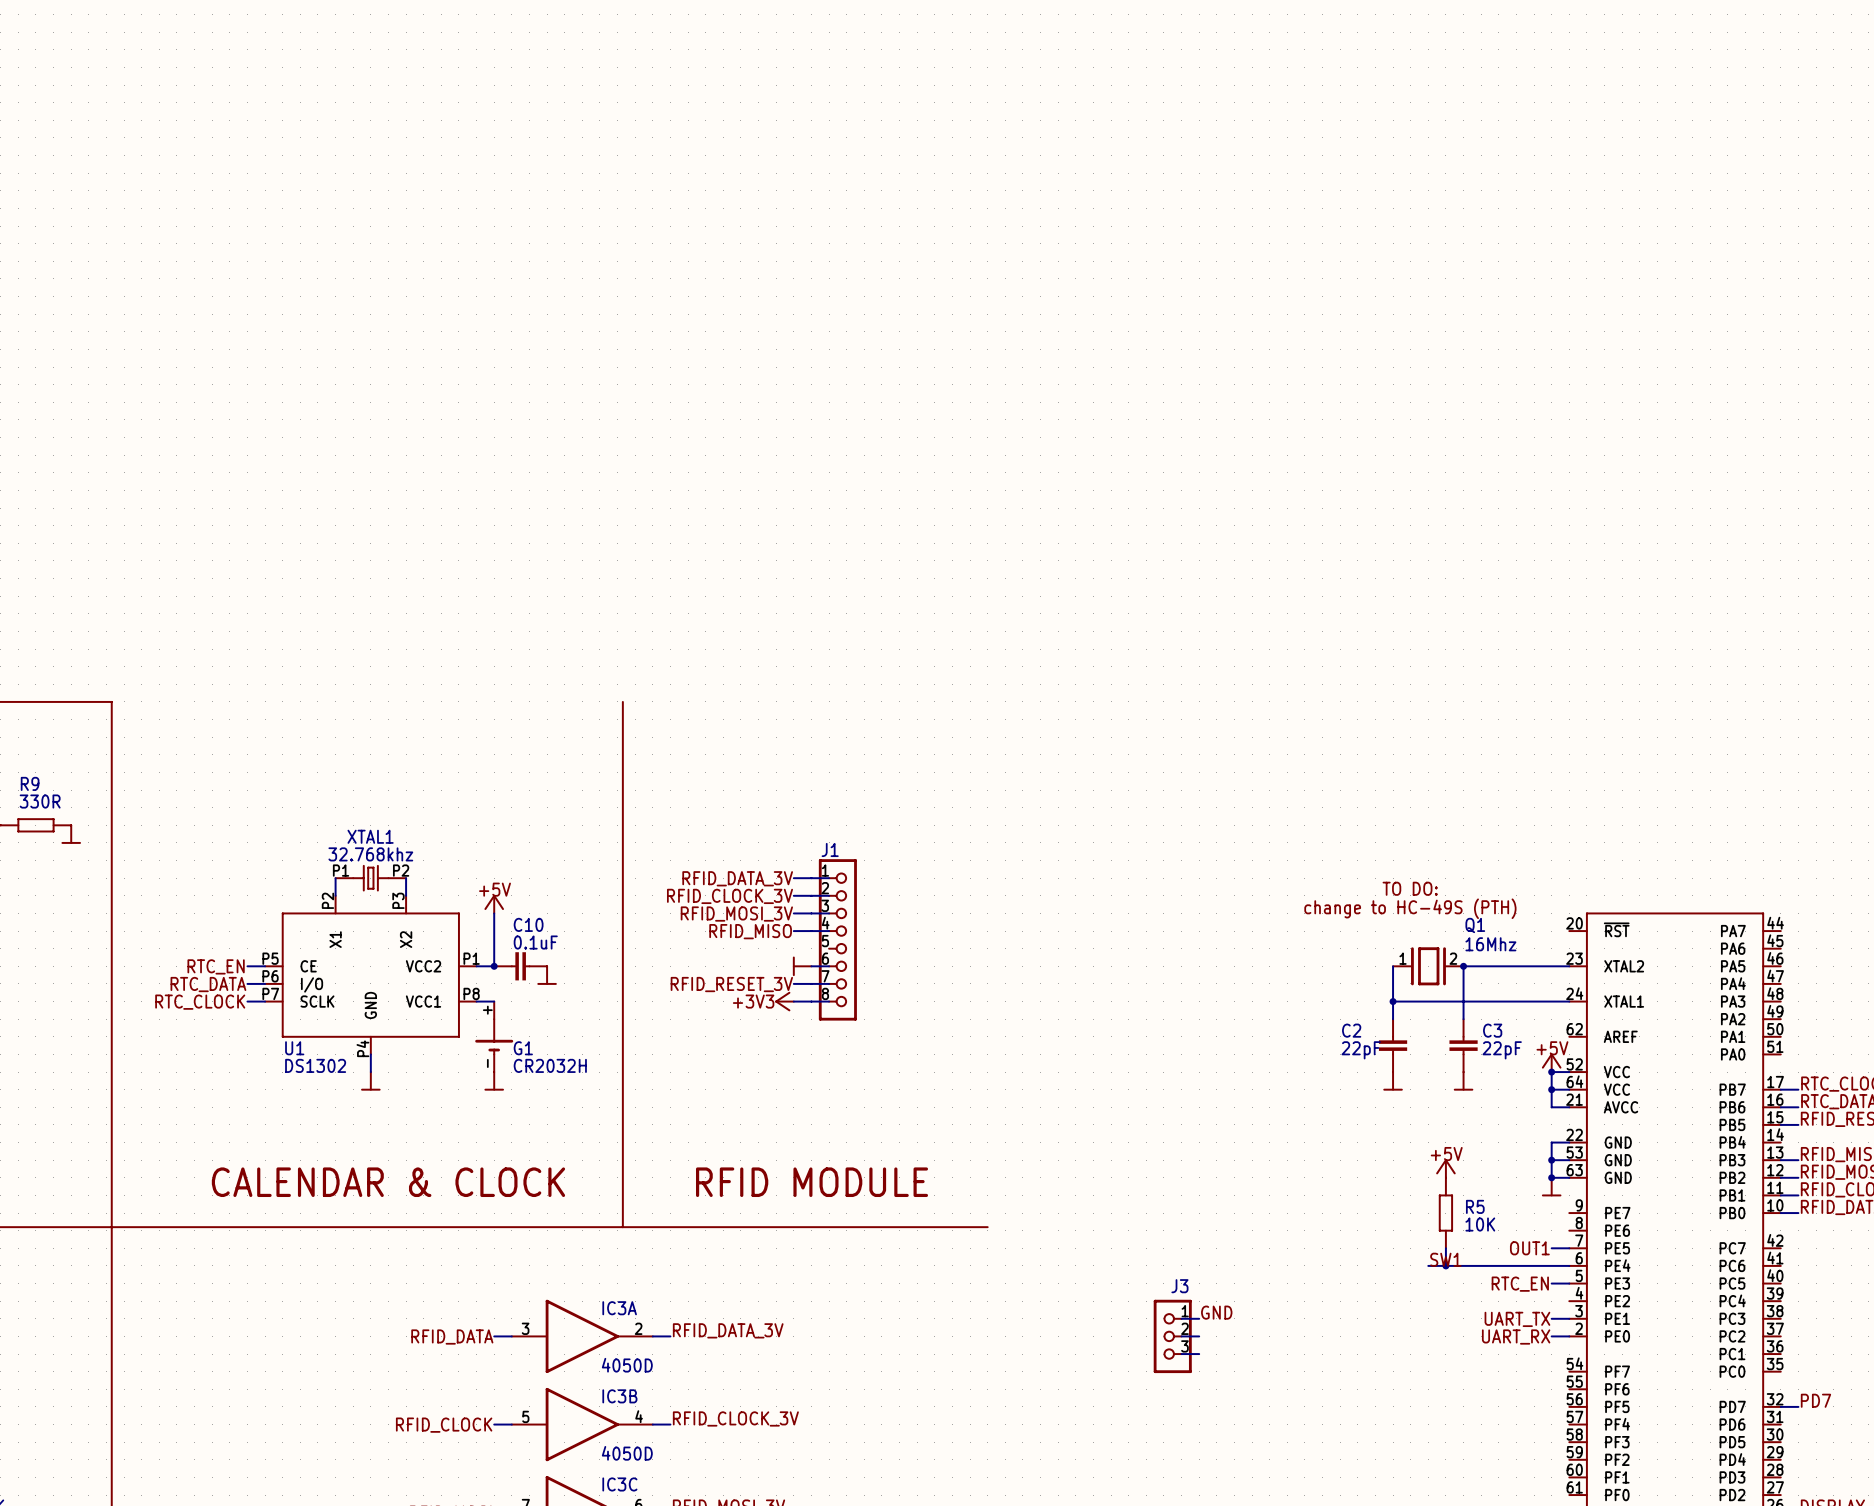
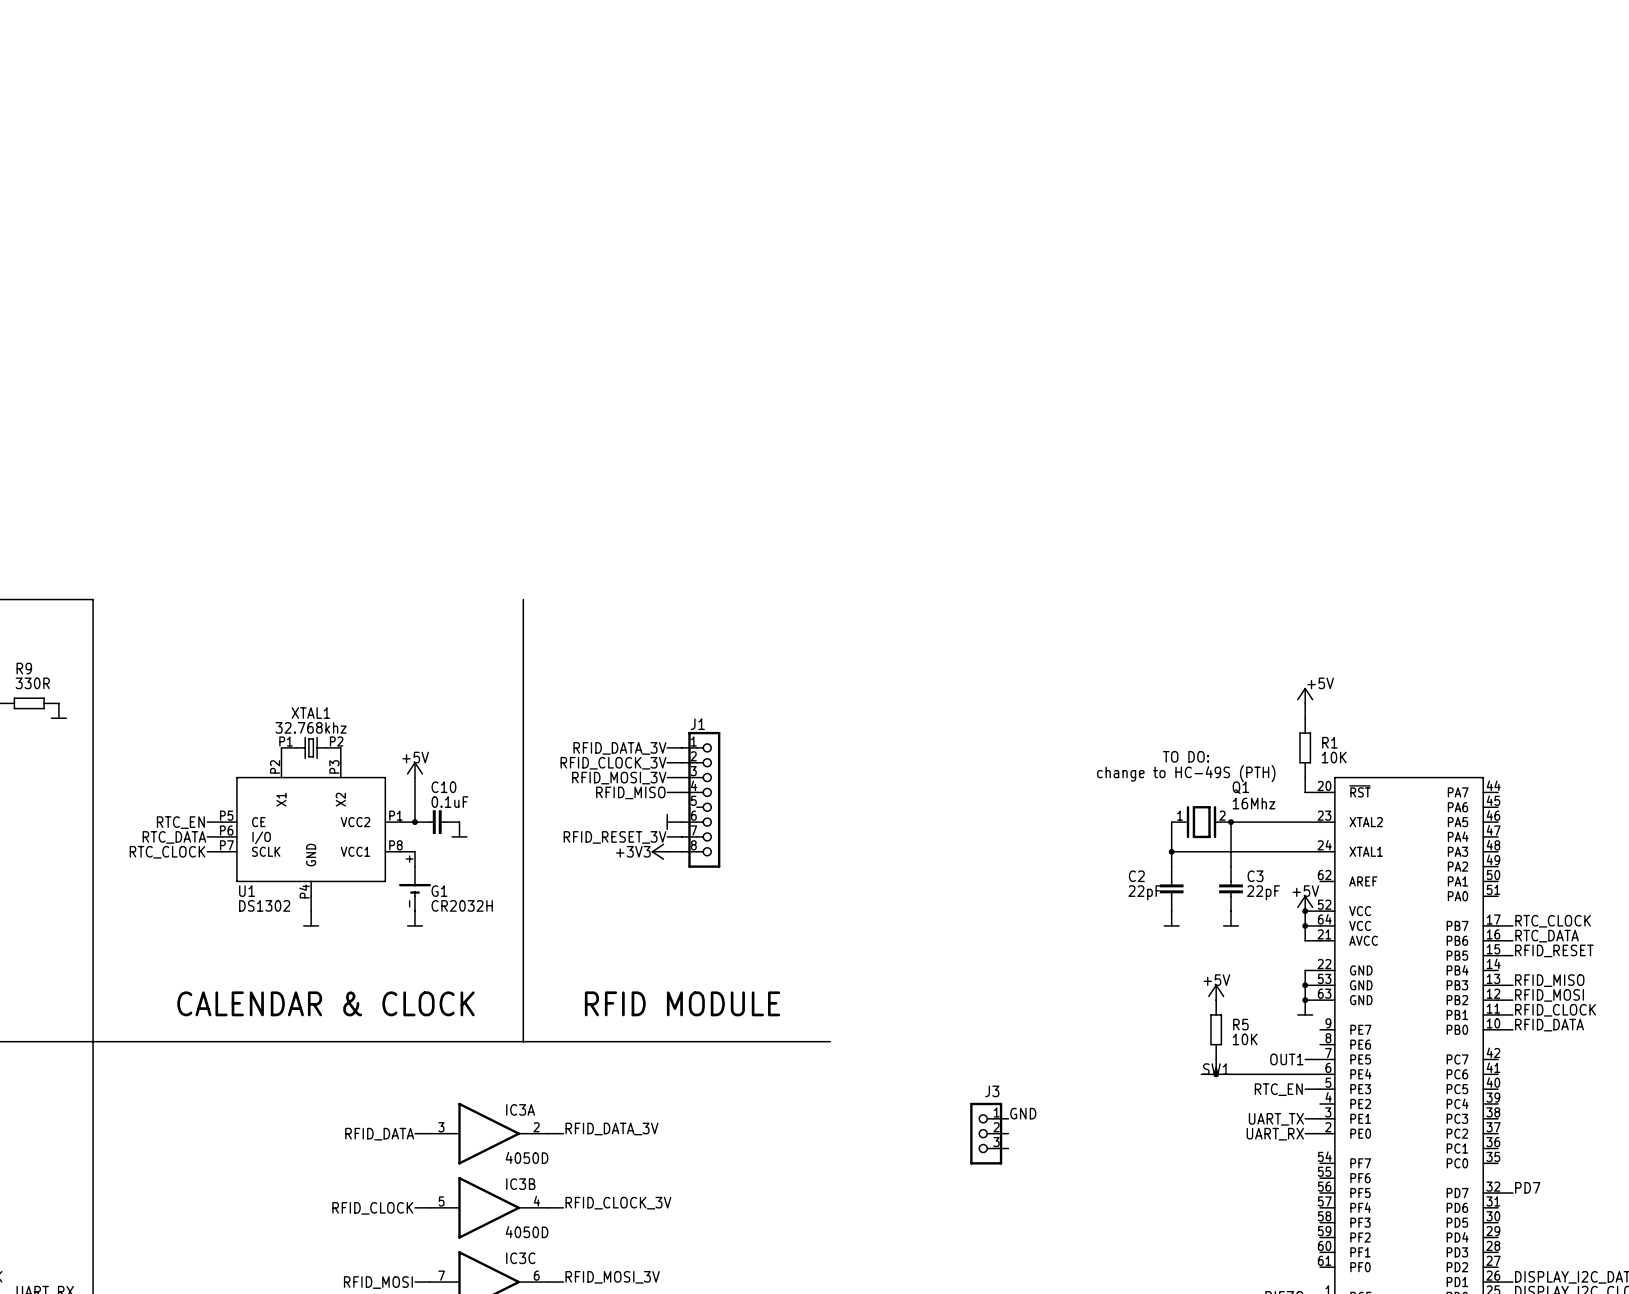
label: none -> +5V (1320, 683)
power symbol: none -> (1305, 695)
wire: none -> (1305, 703) (1305, 718)
R1: none -> 10K (1305, 747)
wire: none -> (1305, 777) (1305, 792) (1320, 792)

